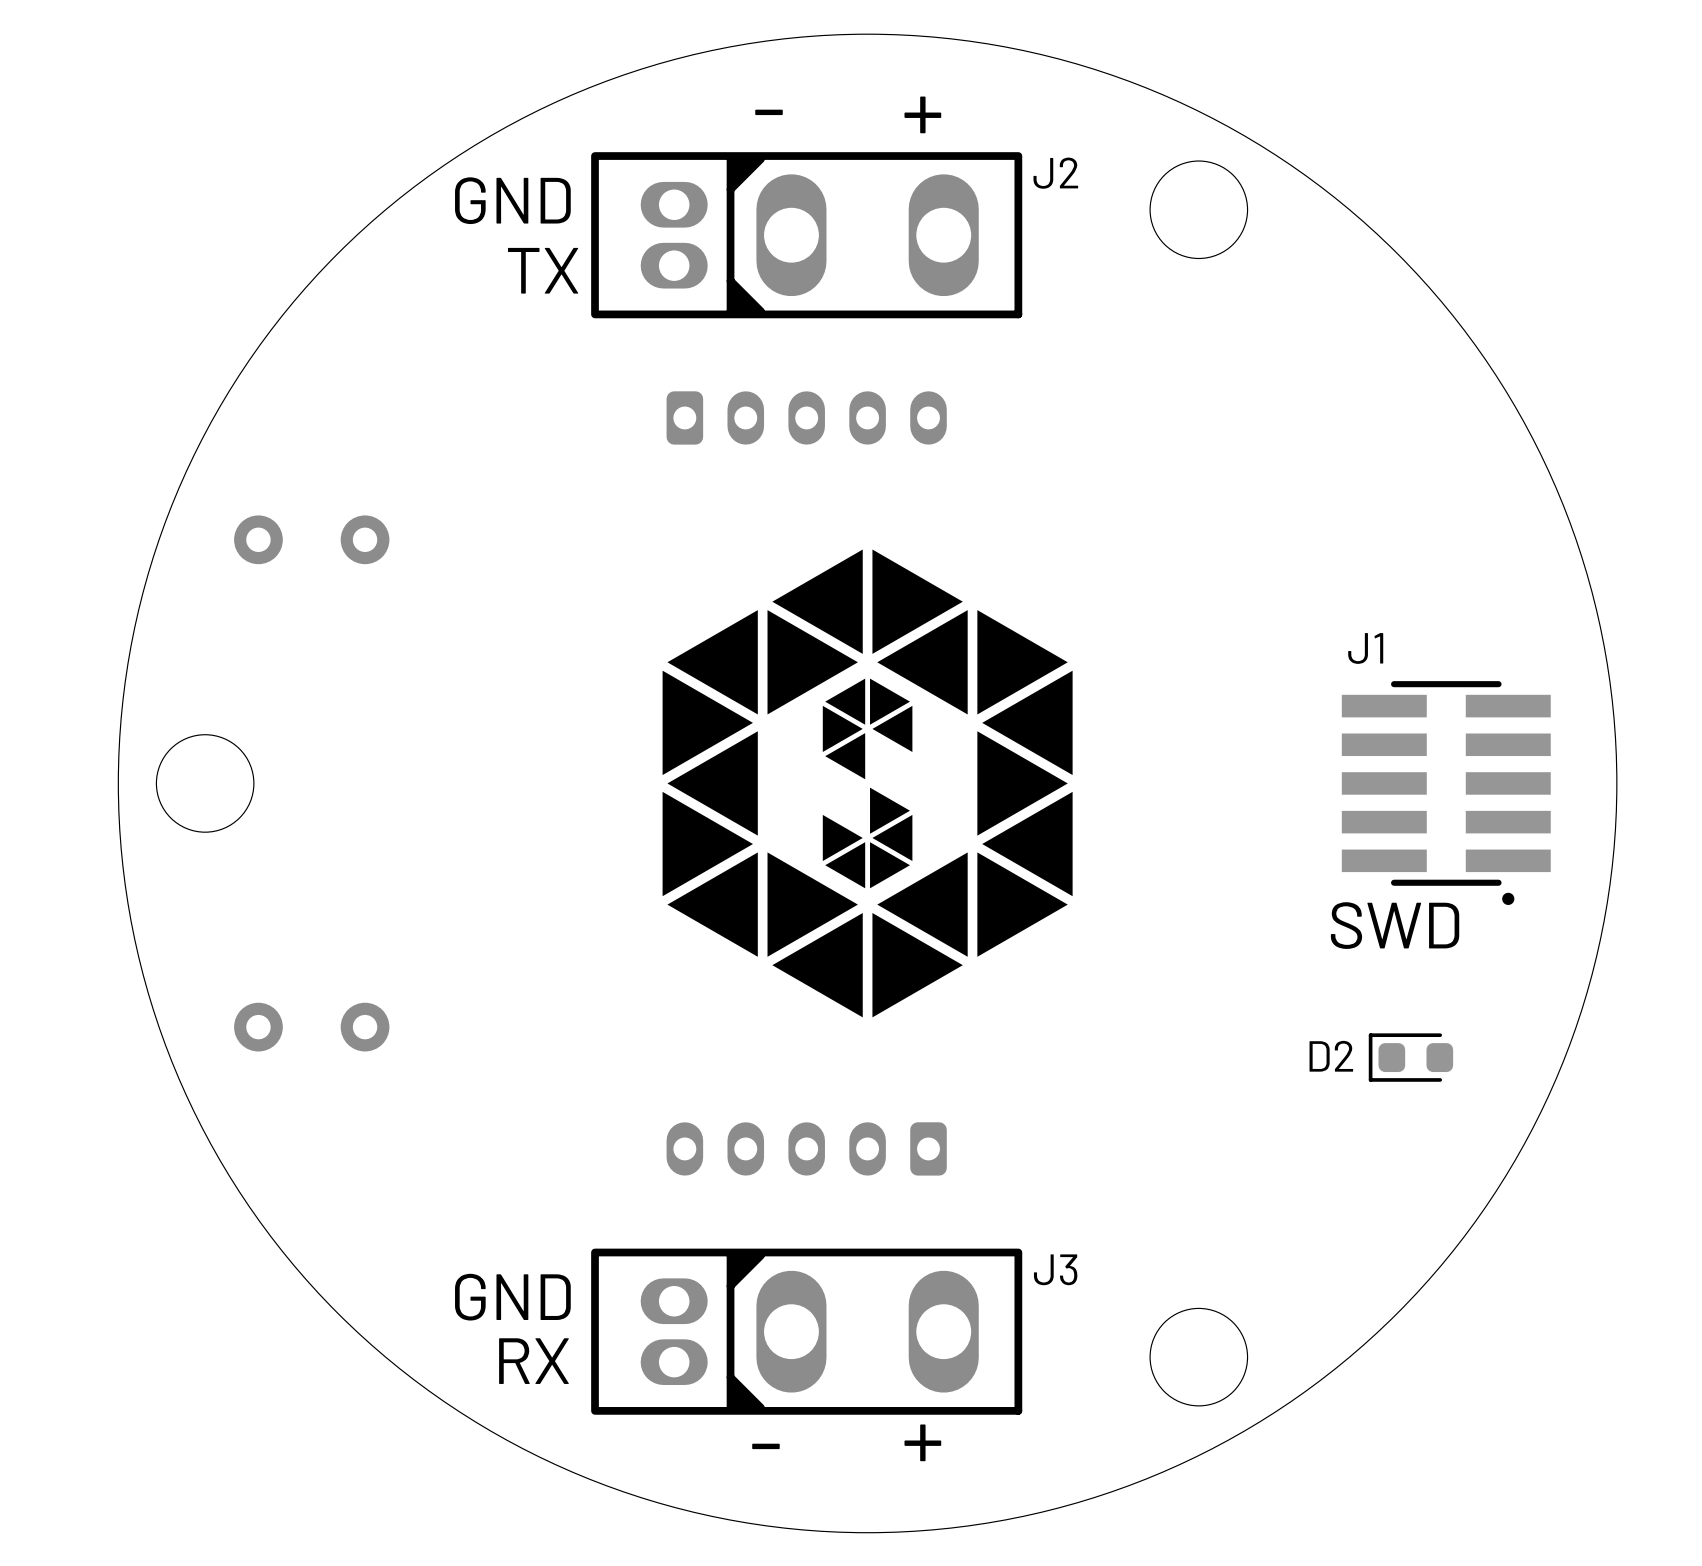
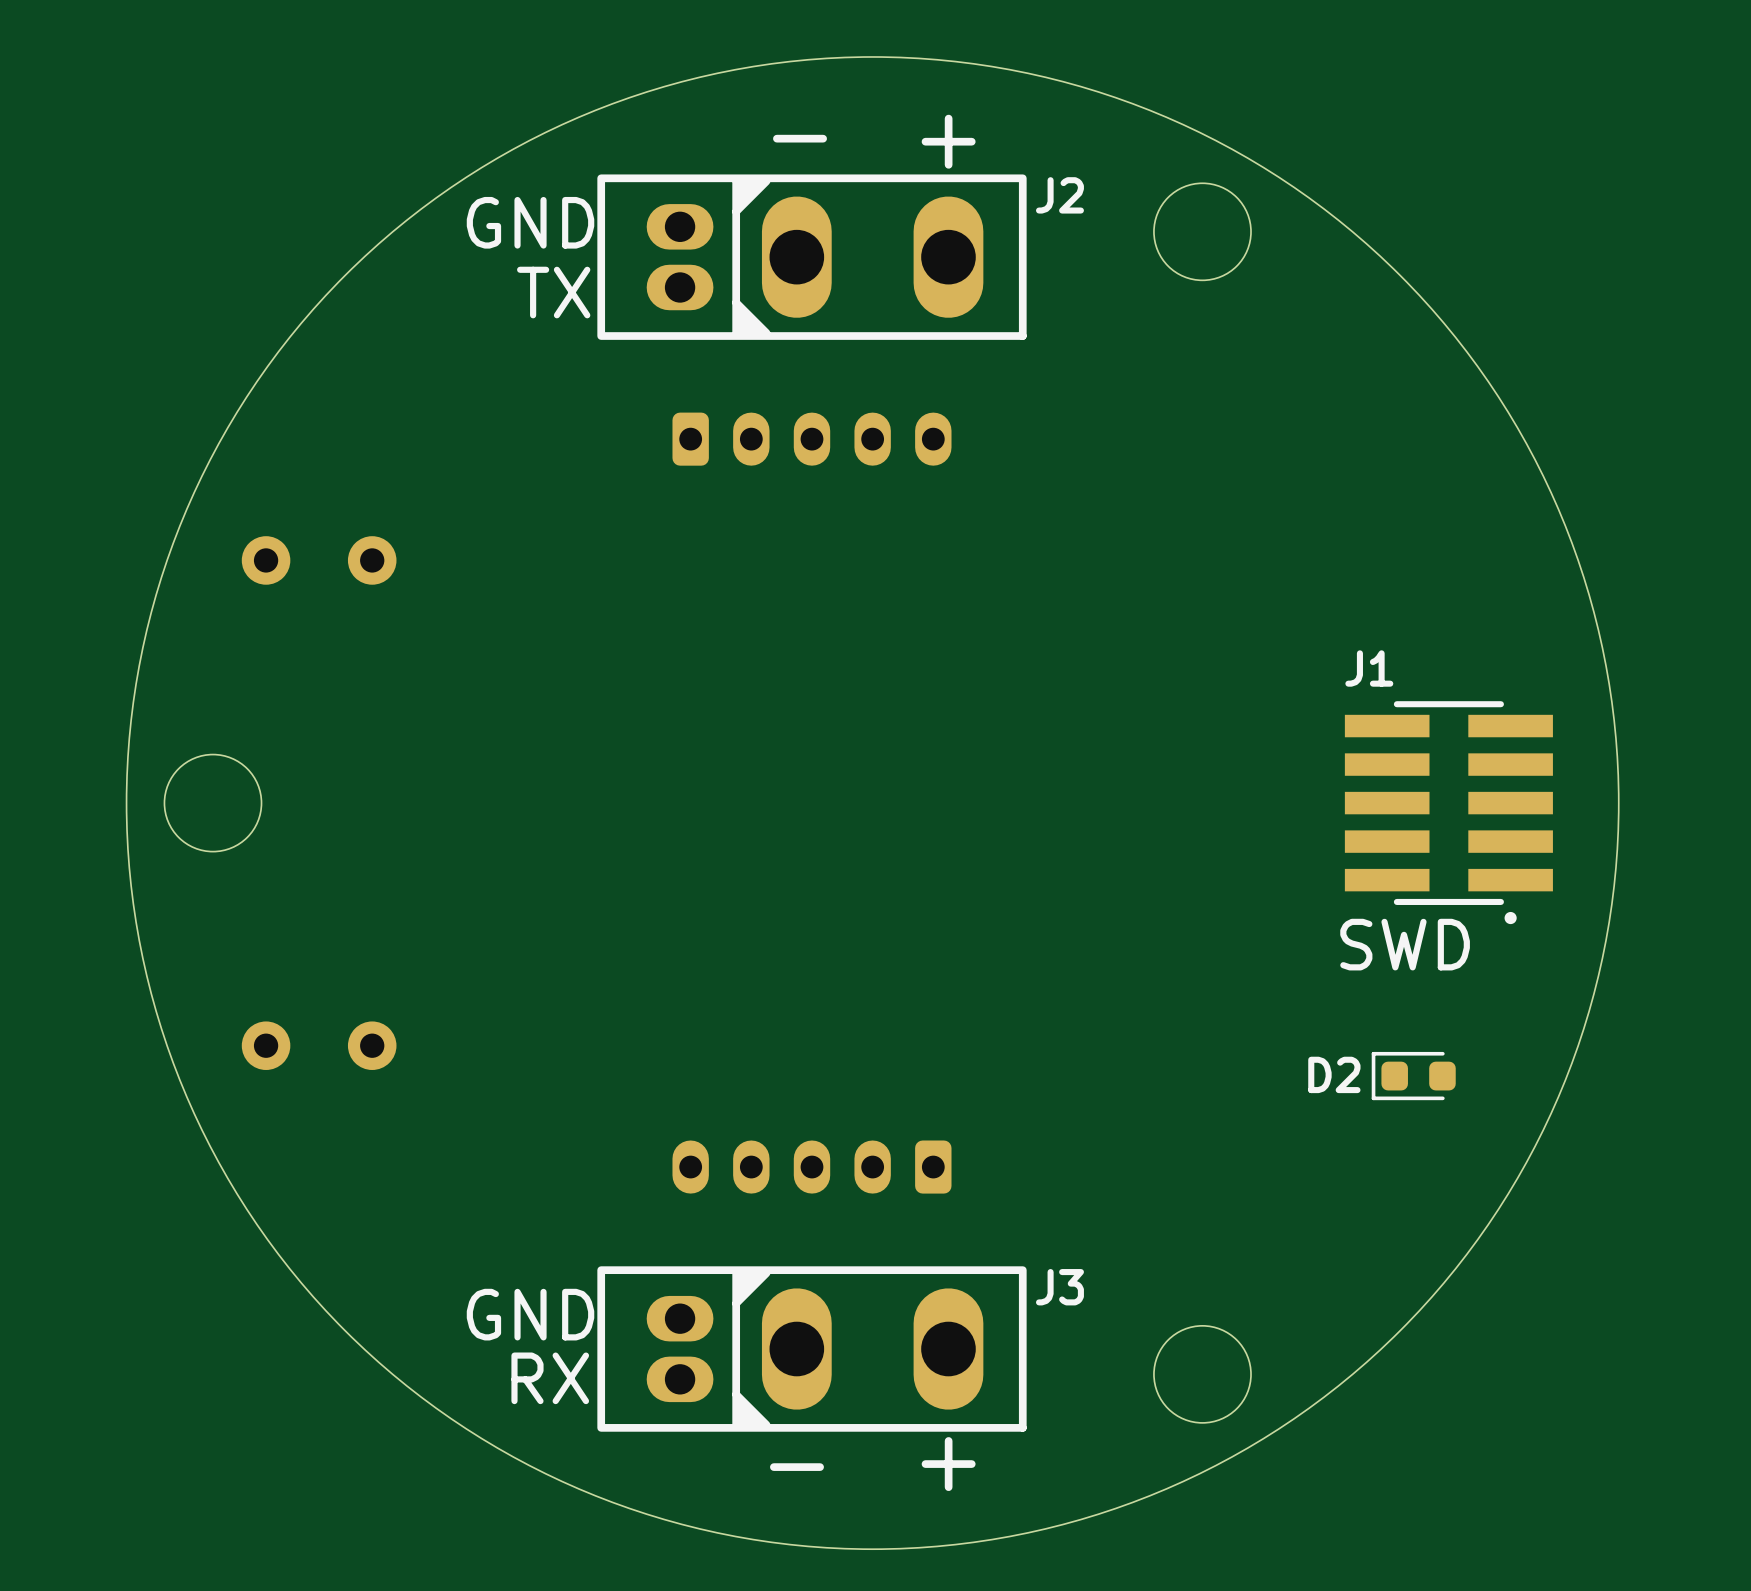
drawing: [662, 549, 1073, 1018] -> none

